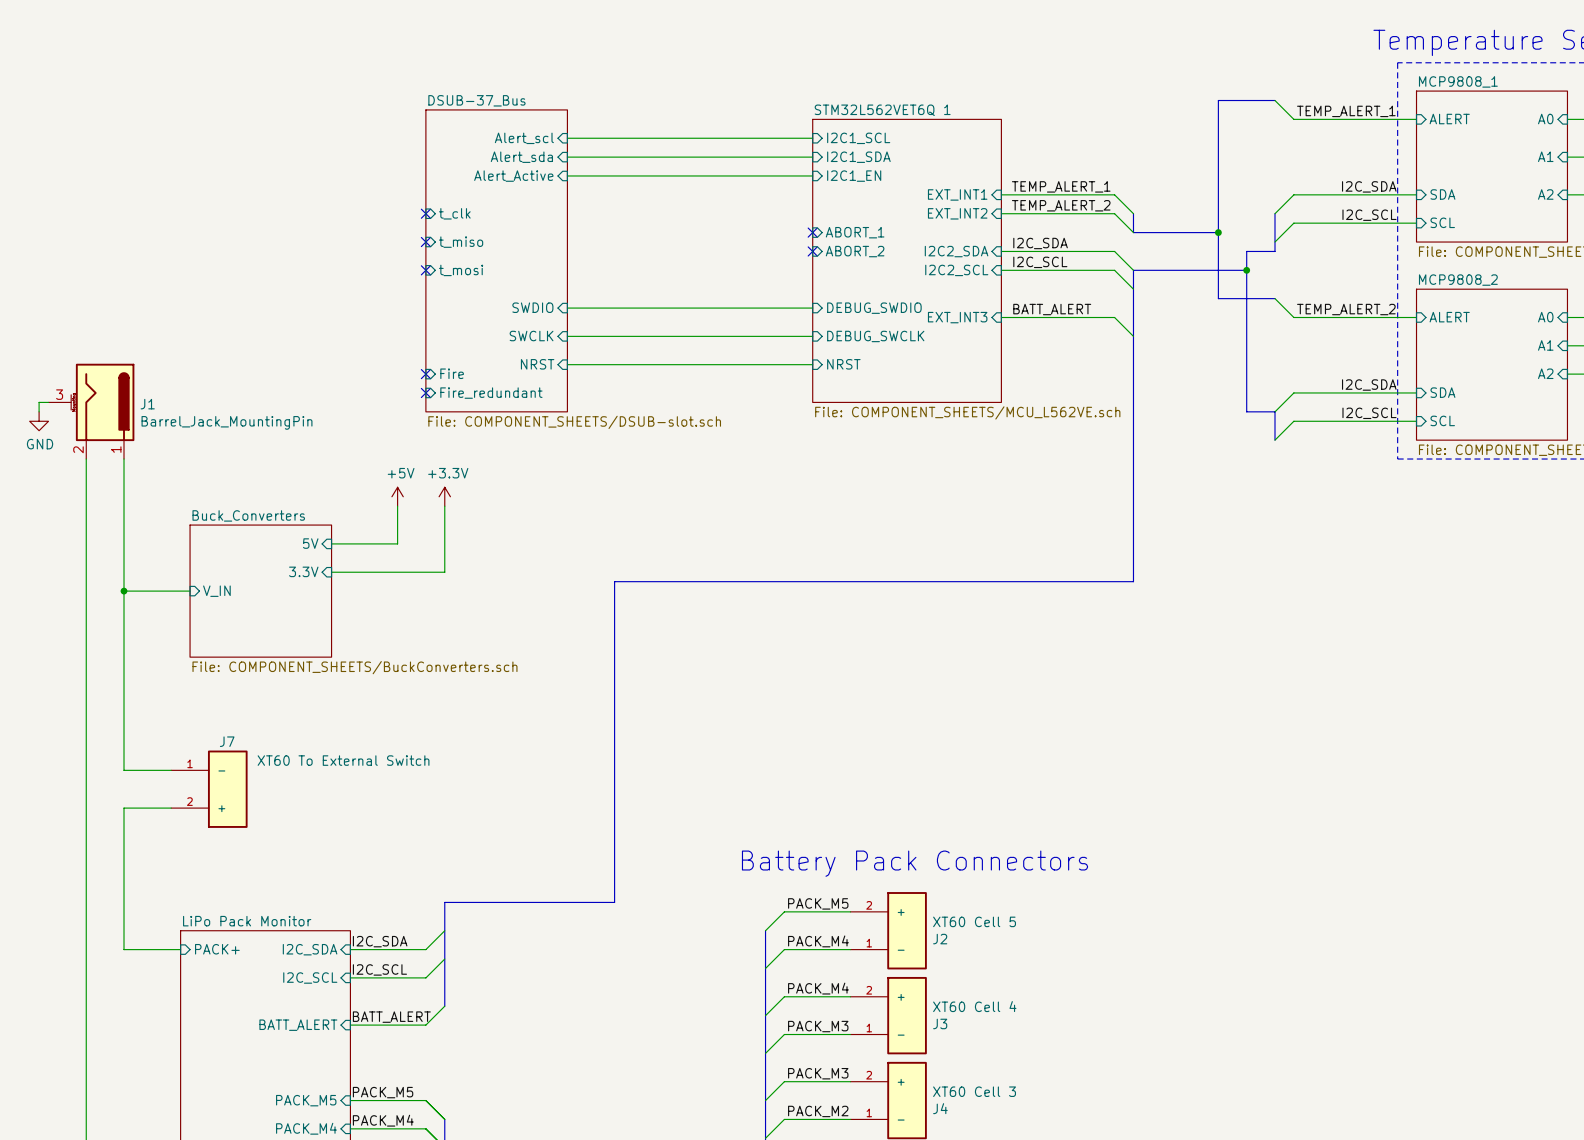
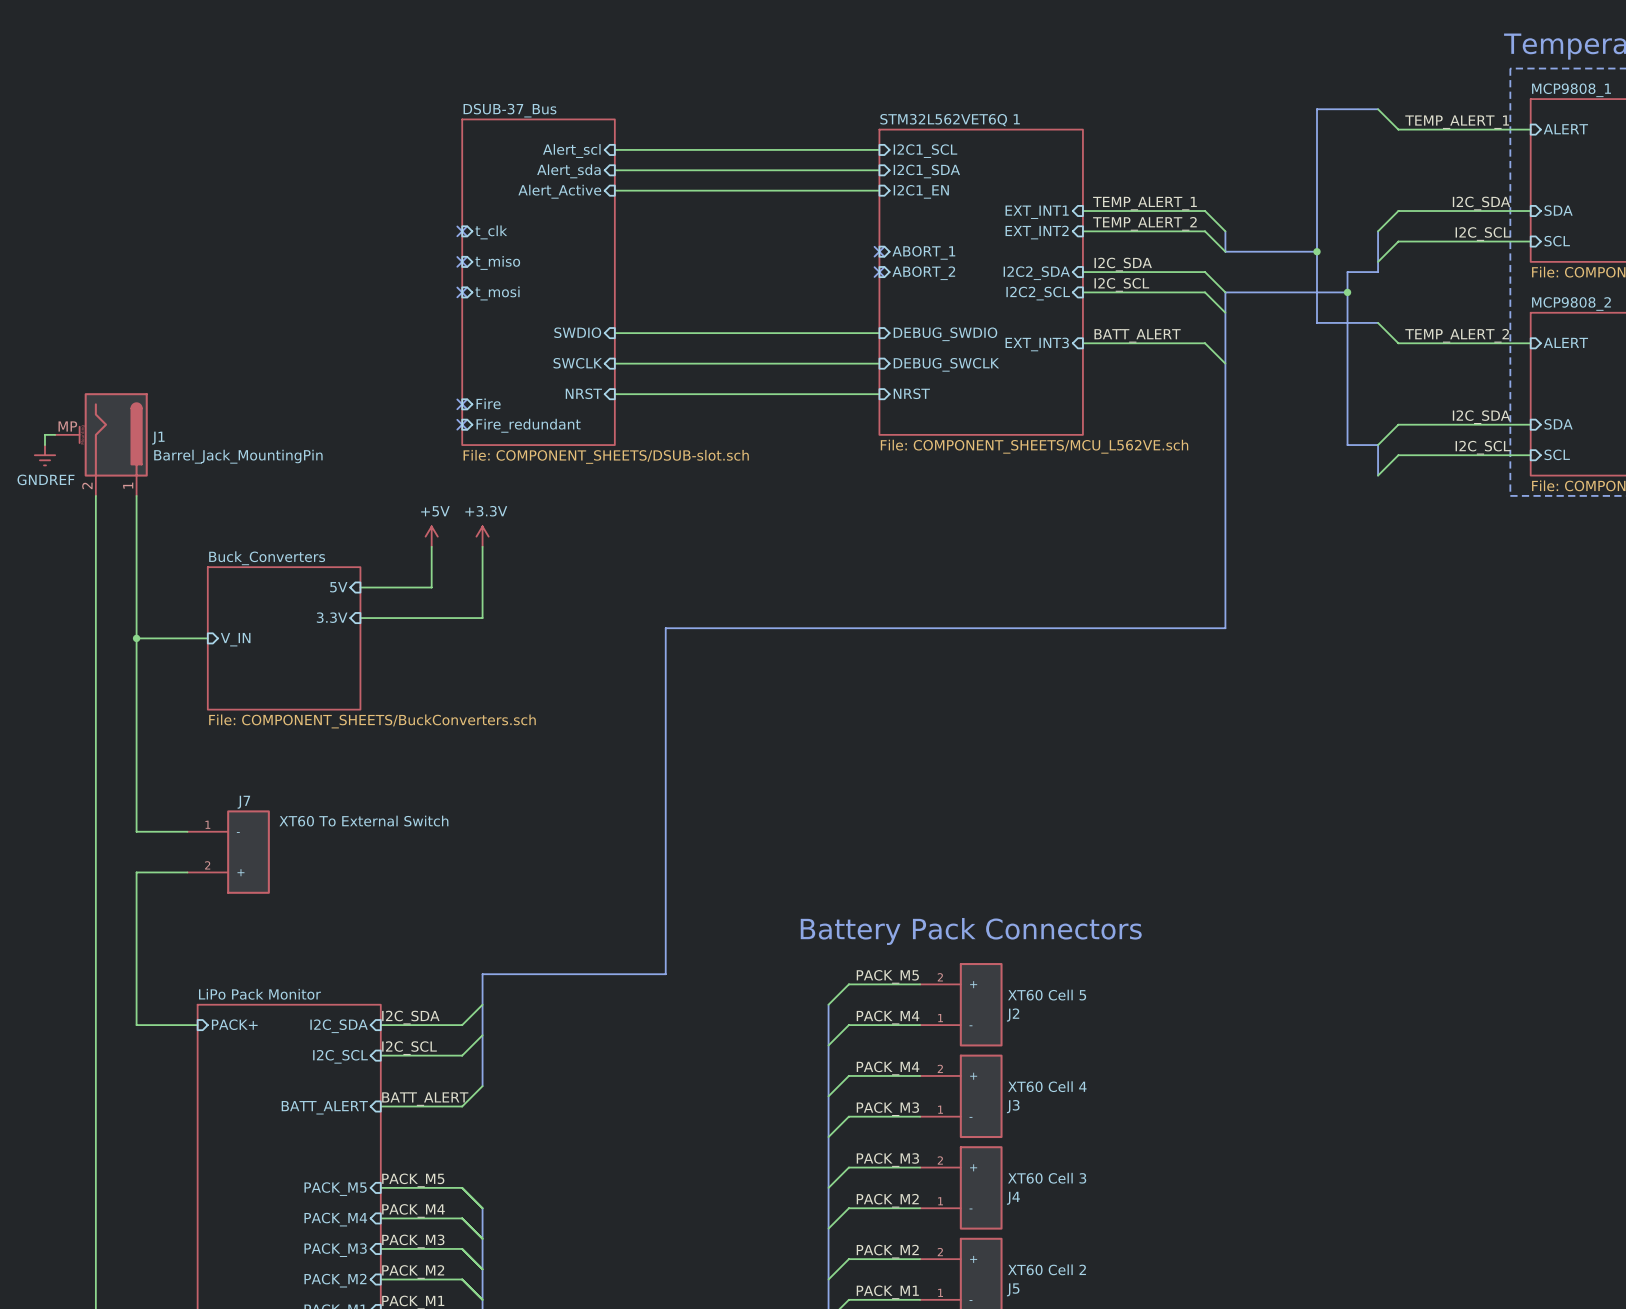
J1 pin number: 3 (59, 394) -> MP (67, 426)
power symbol: GND (39, 421) -> GNDREF (44, 455)

